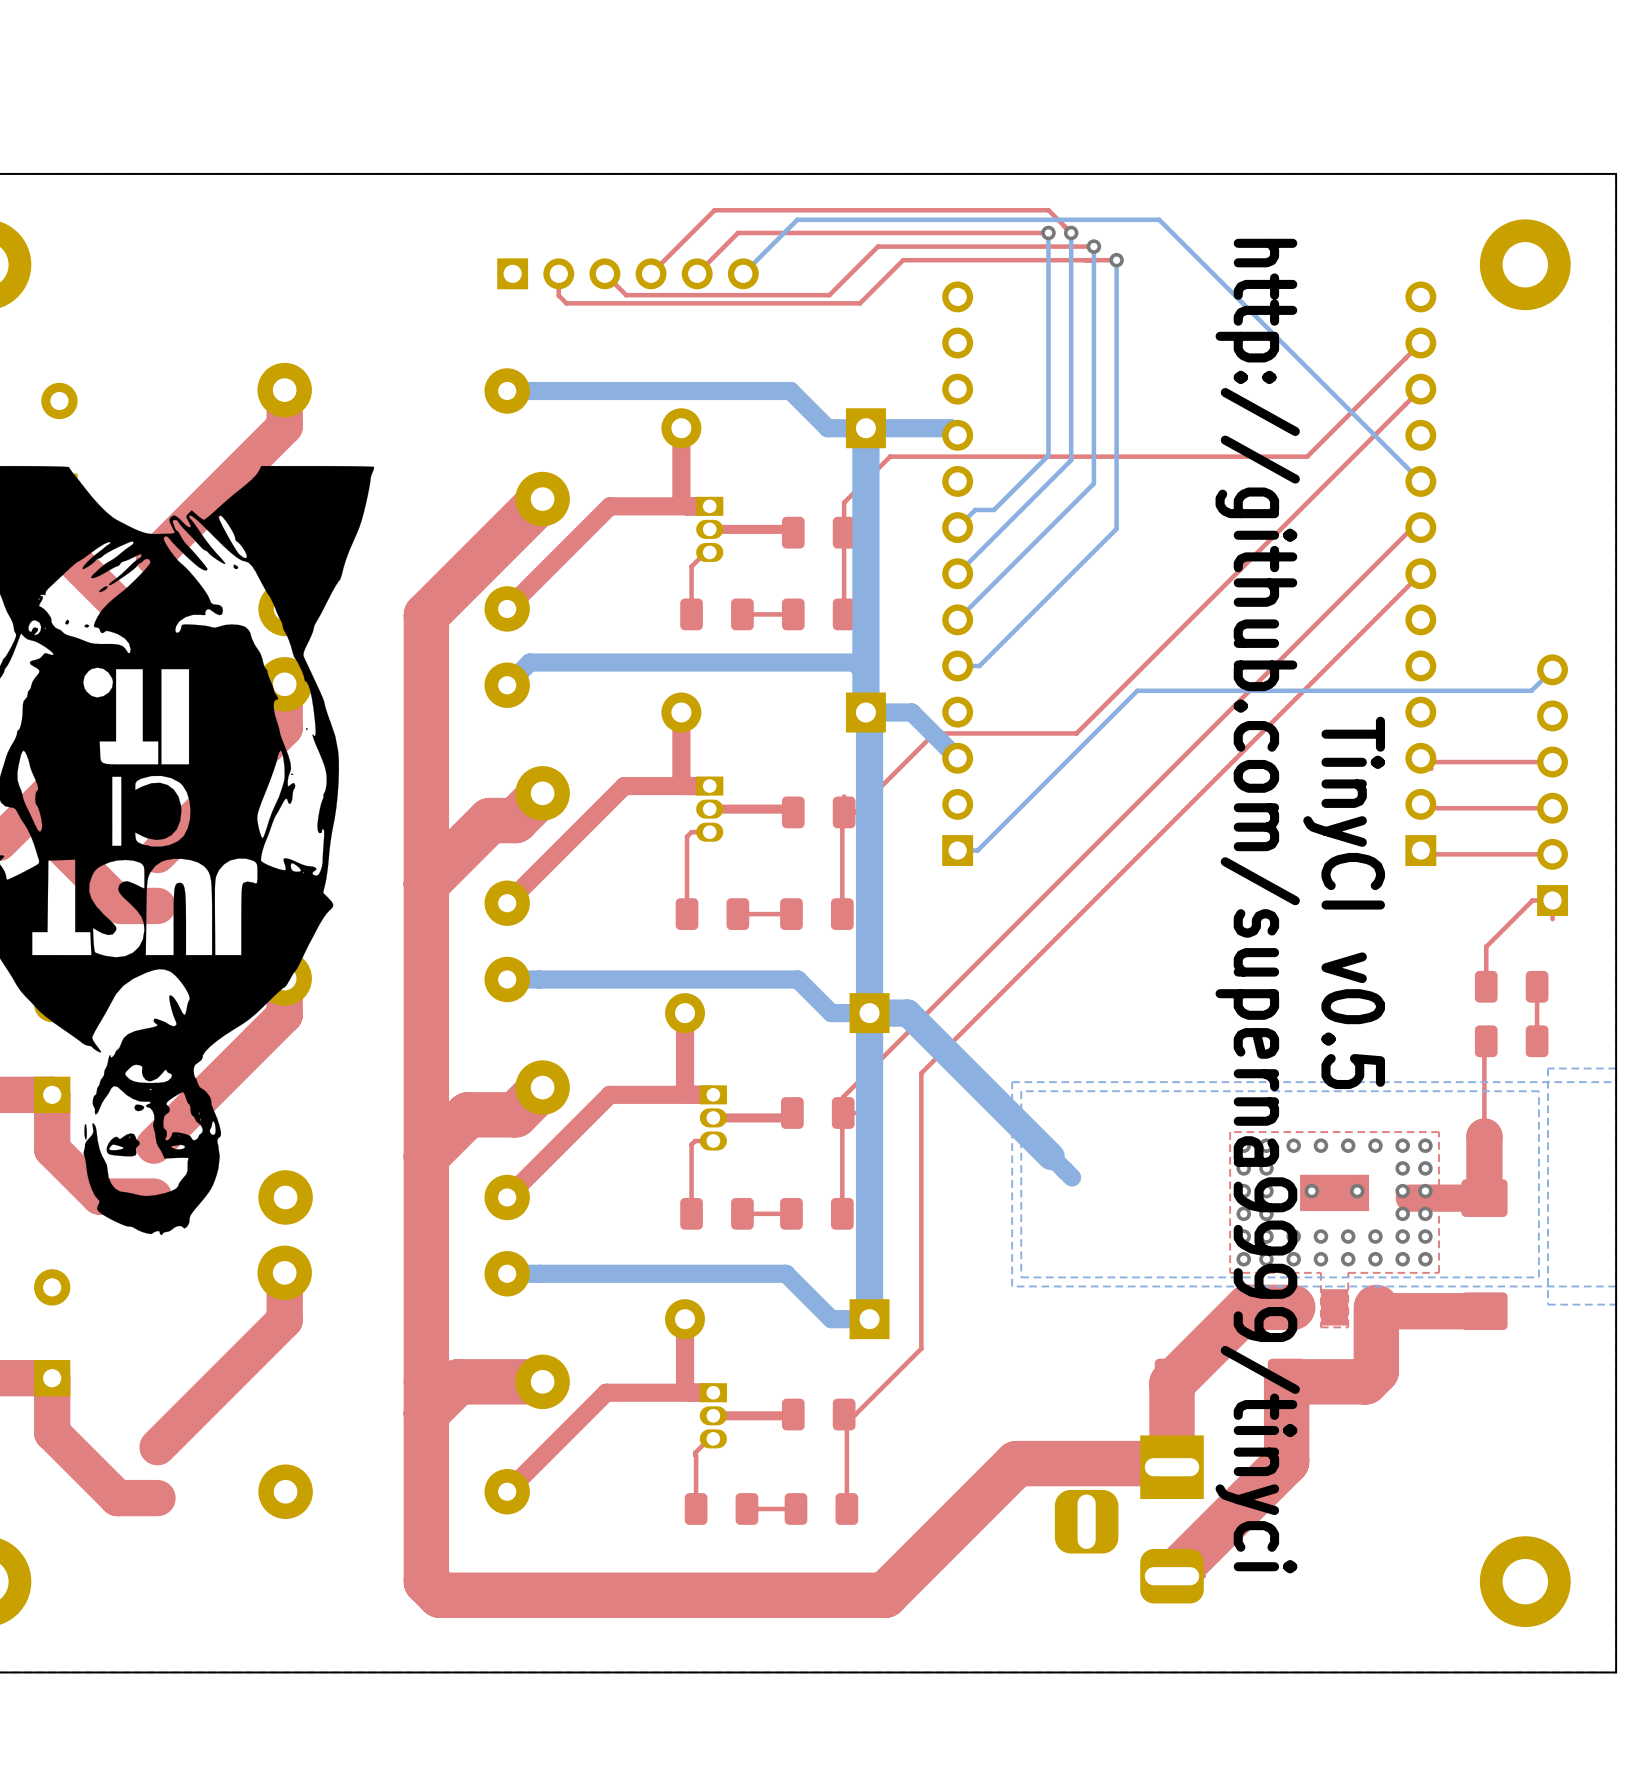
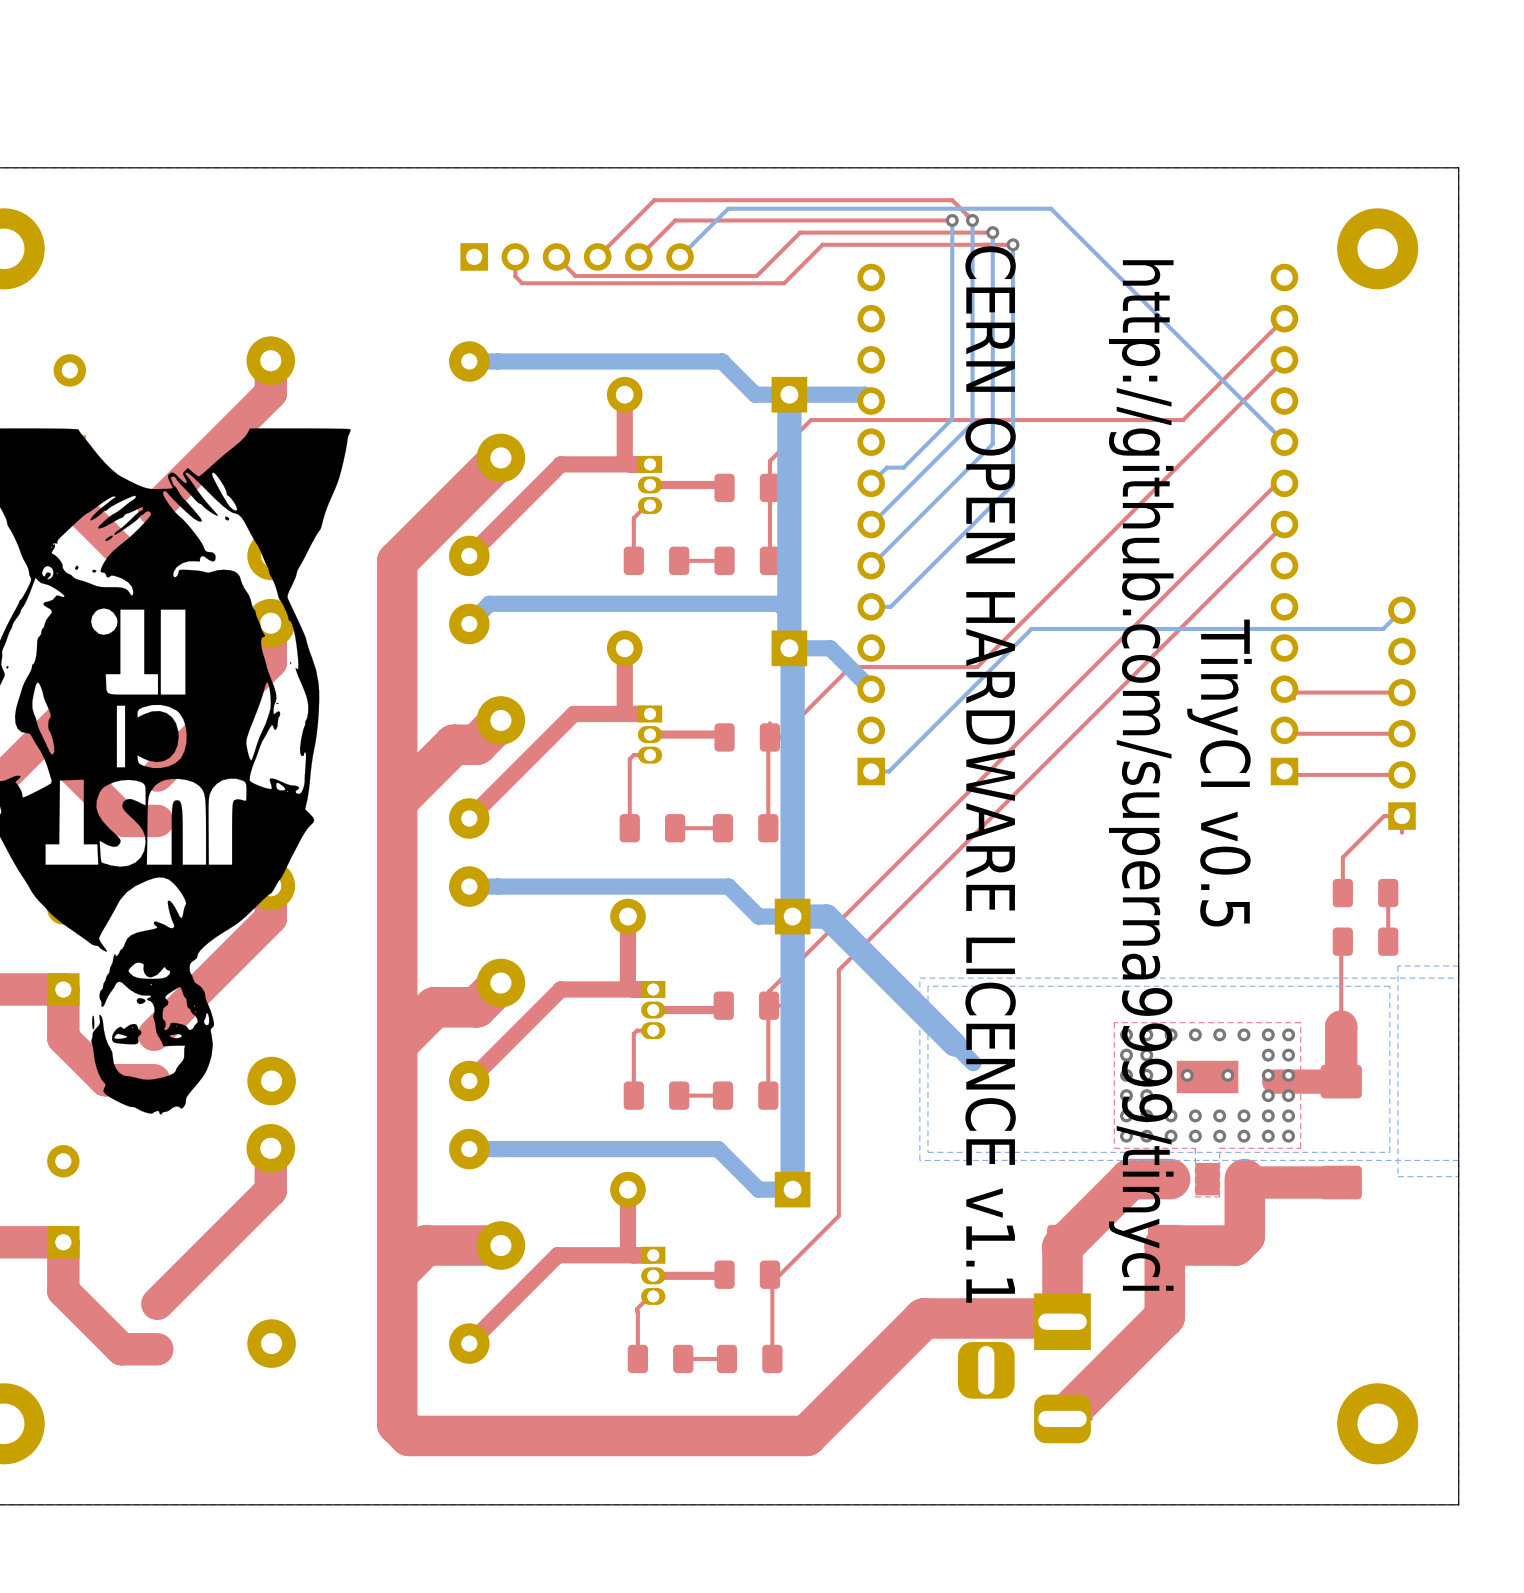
text: none -> CERN OPEN HARDWARE LICENCE v1.1 (990, 774)
text position: TinyCI v0.5 (1344, 902) -> TinyCI v0.5 (1219, 773)
text position: http://github.com/superna9999/tinyci (1257, 906) -> http://github.com/superna9999/tinyci (1141, 775)

